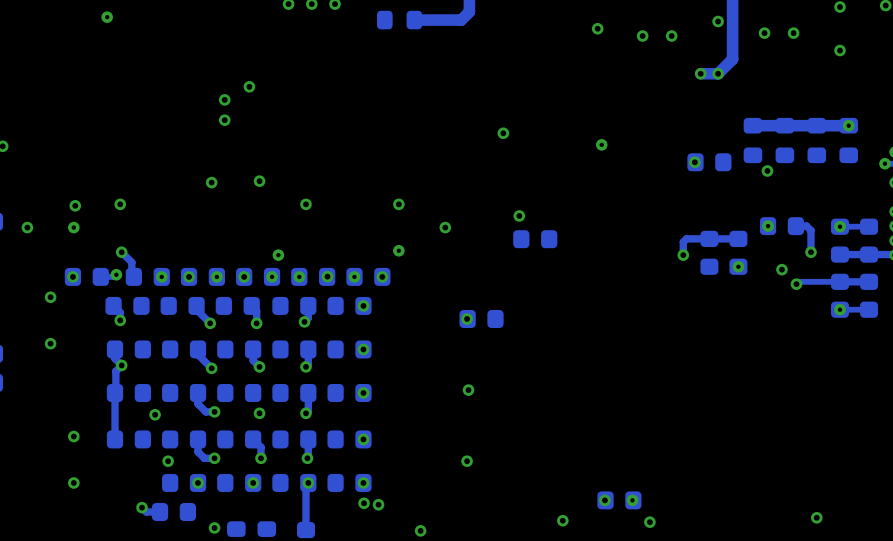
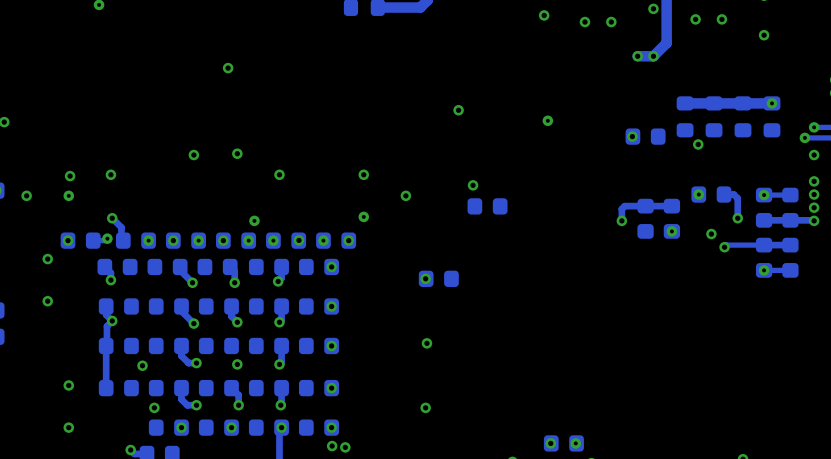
via: (224, 99) -> none
via: (224, 120) -> none

